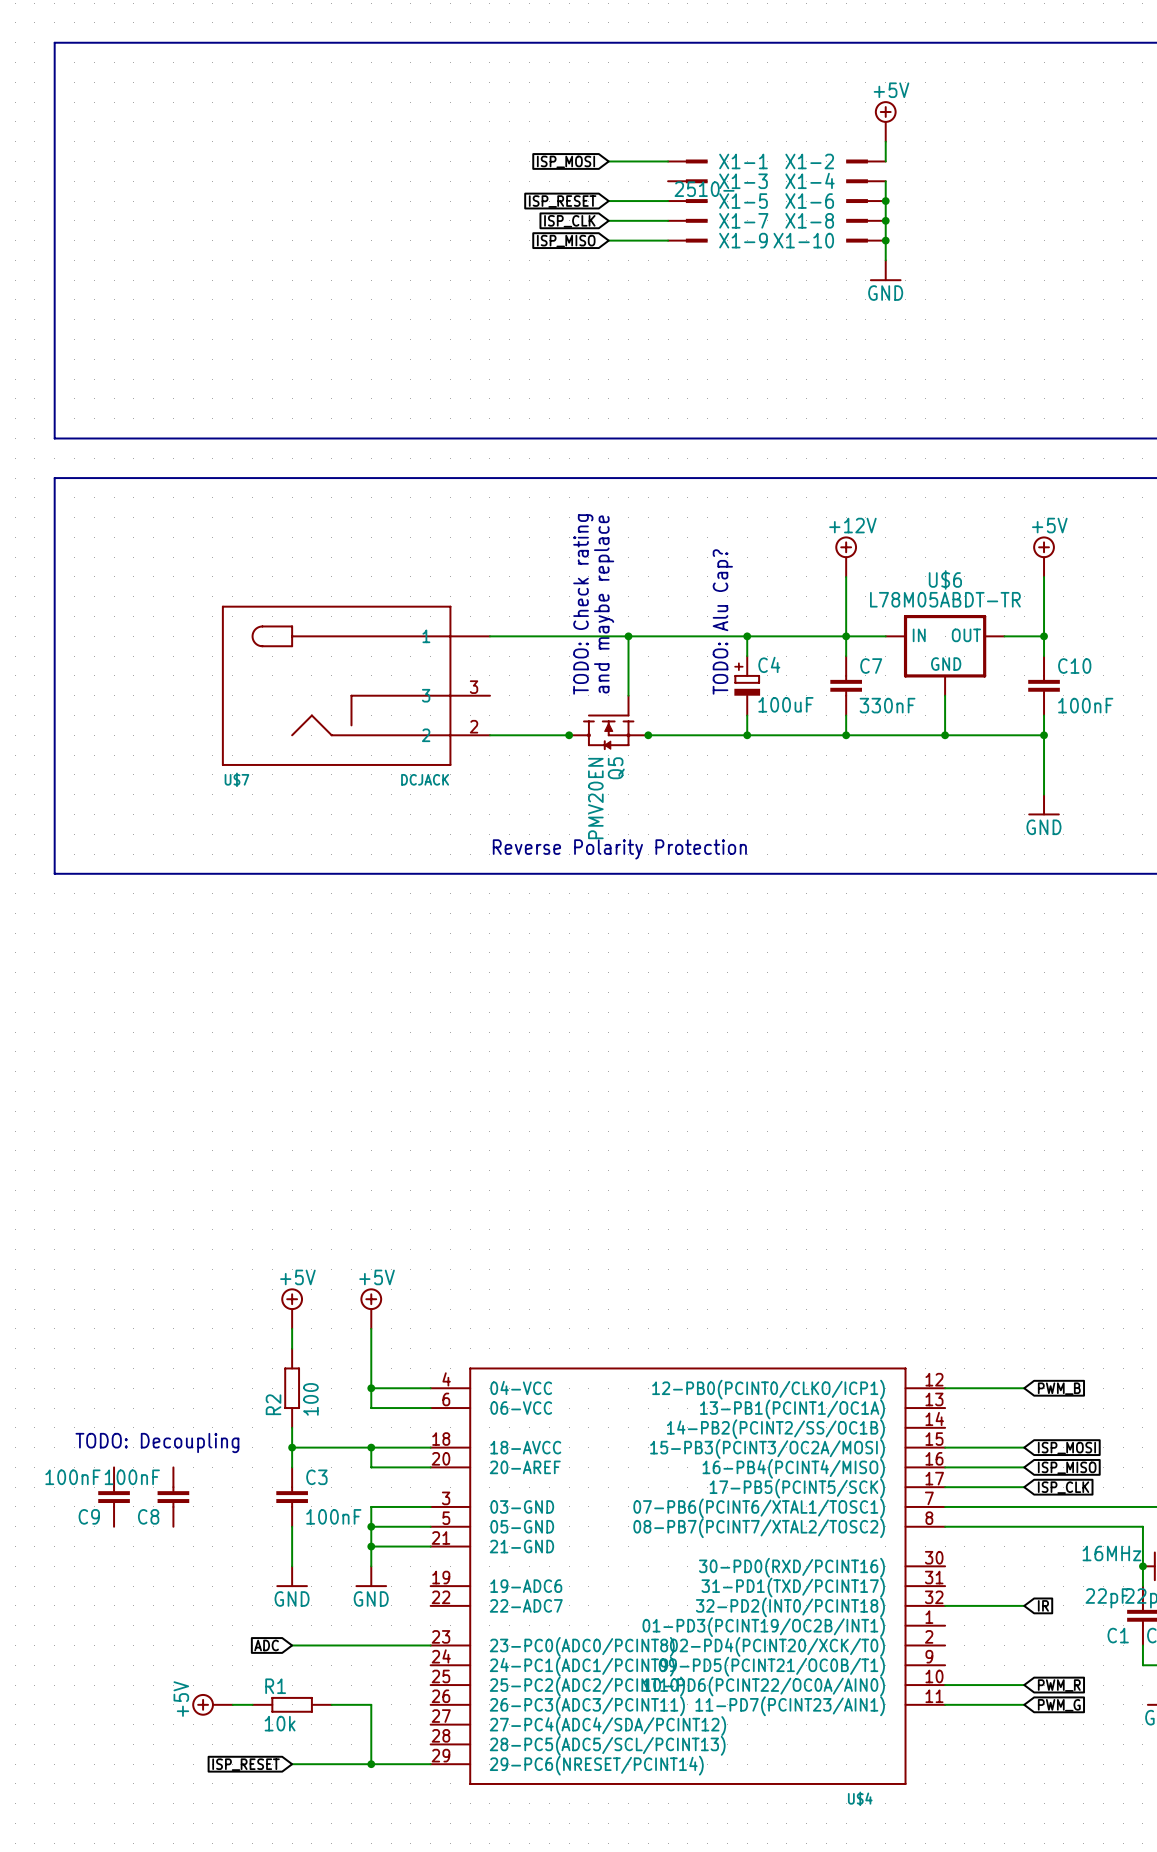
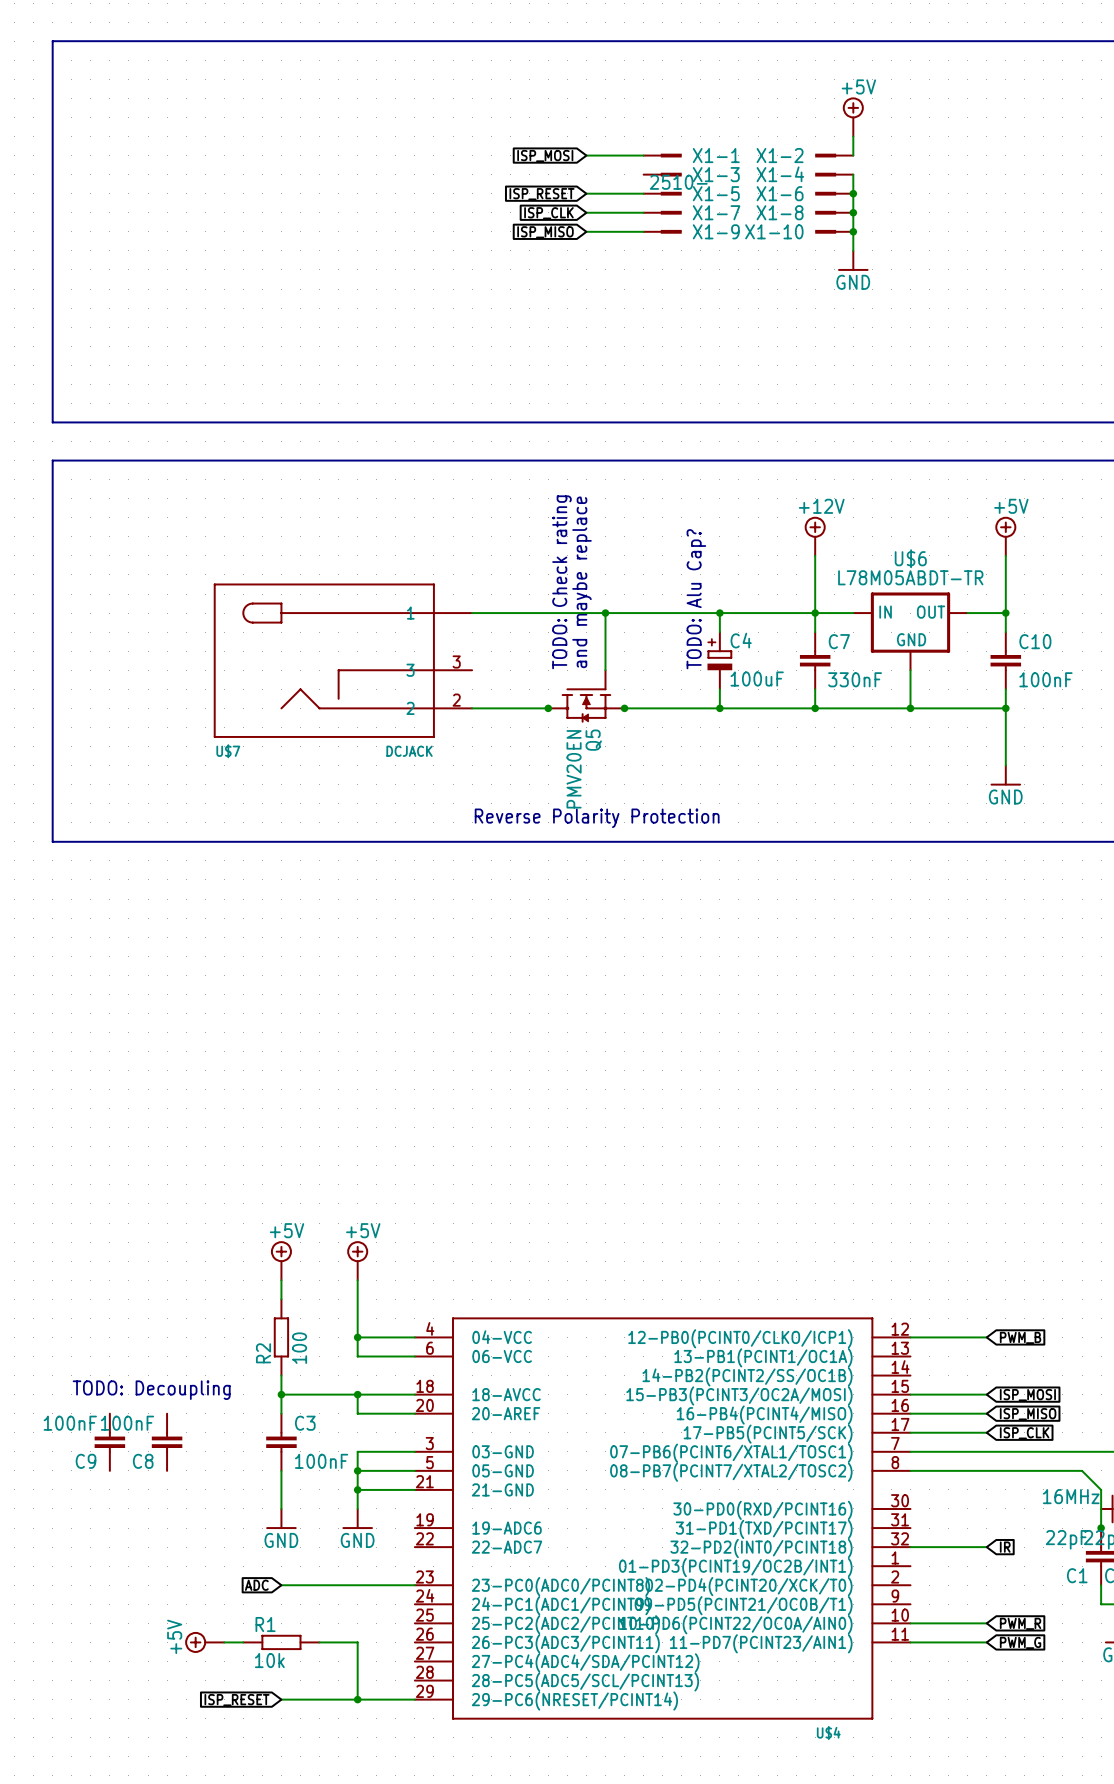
wire: (1123, 1526) (1142, 1526) (1142, 1546) -> (1082, 1470) (1101, 1489)
junction position: (1142, 1566) -> (1101, 1528)

